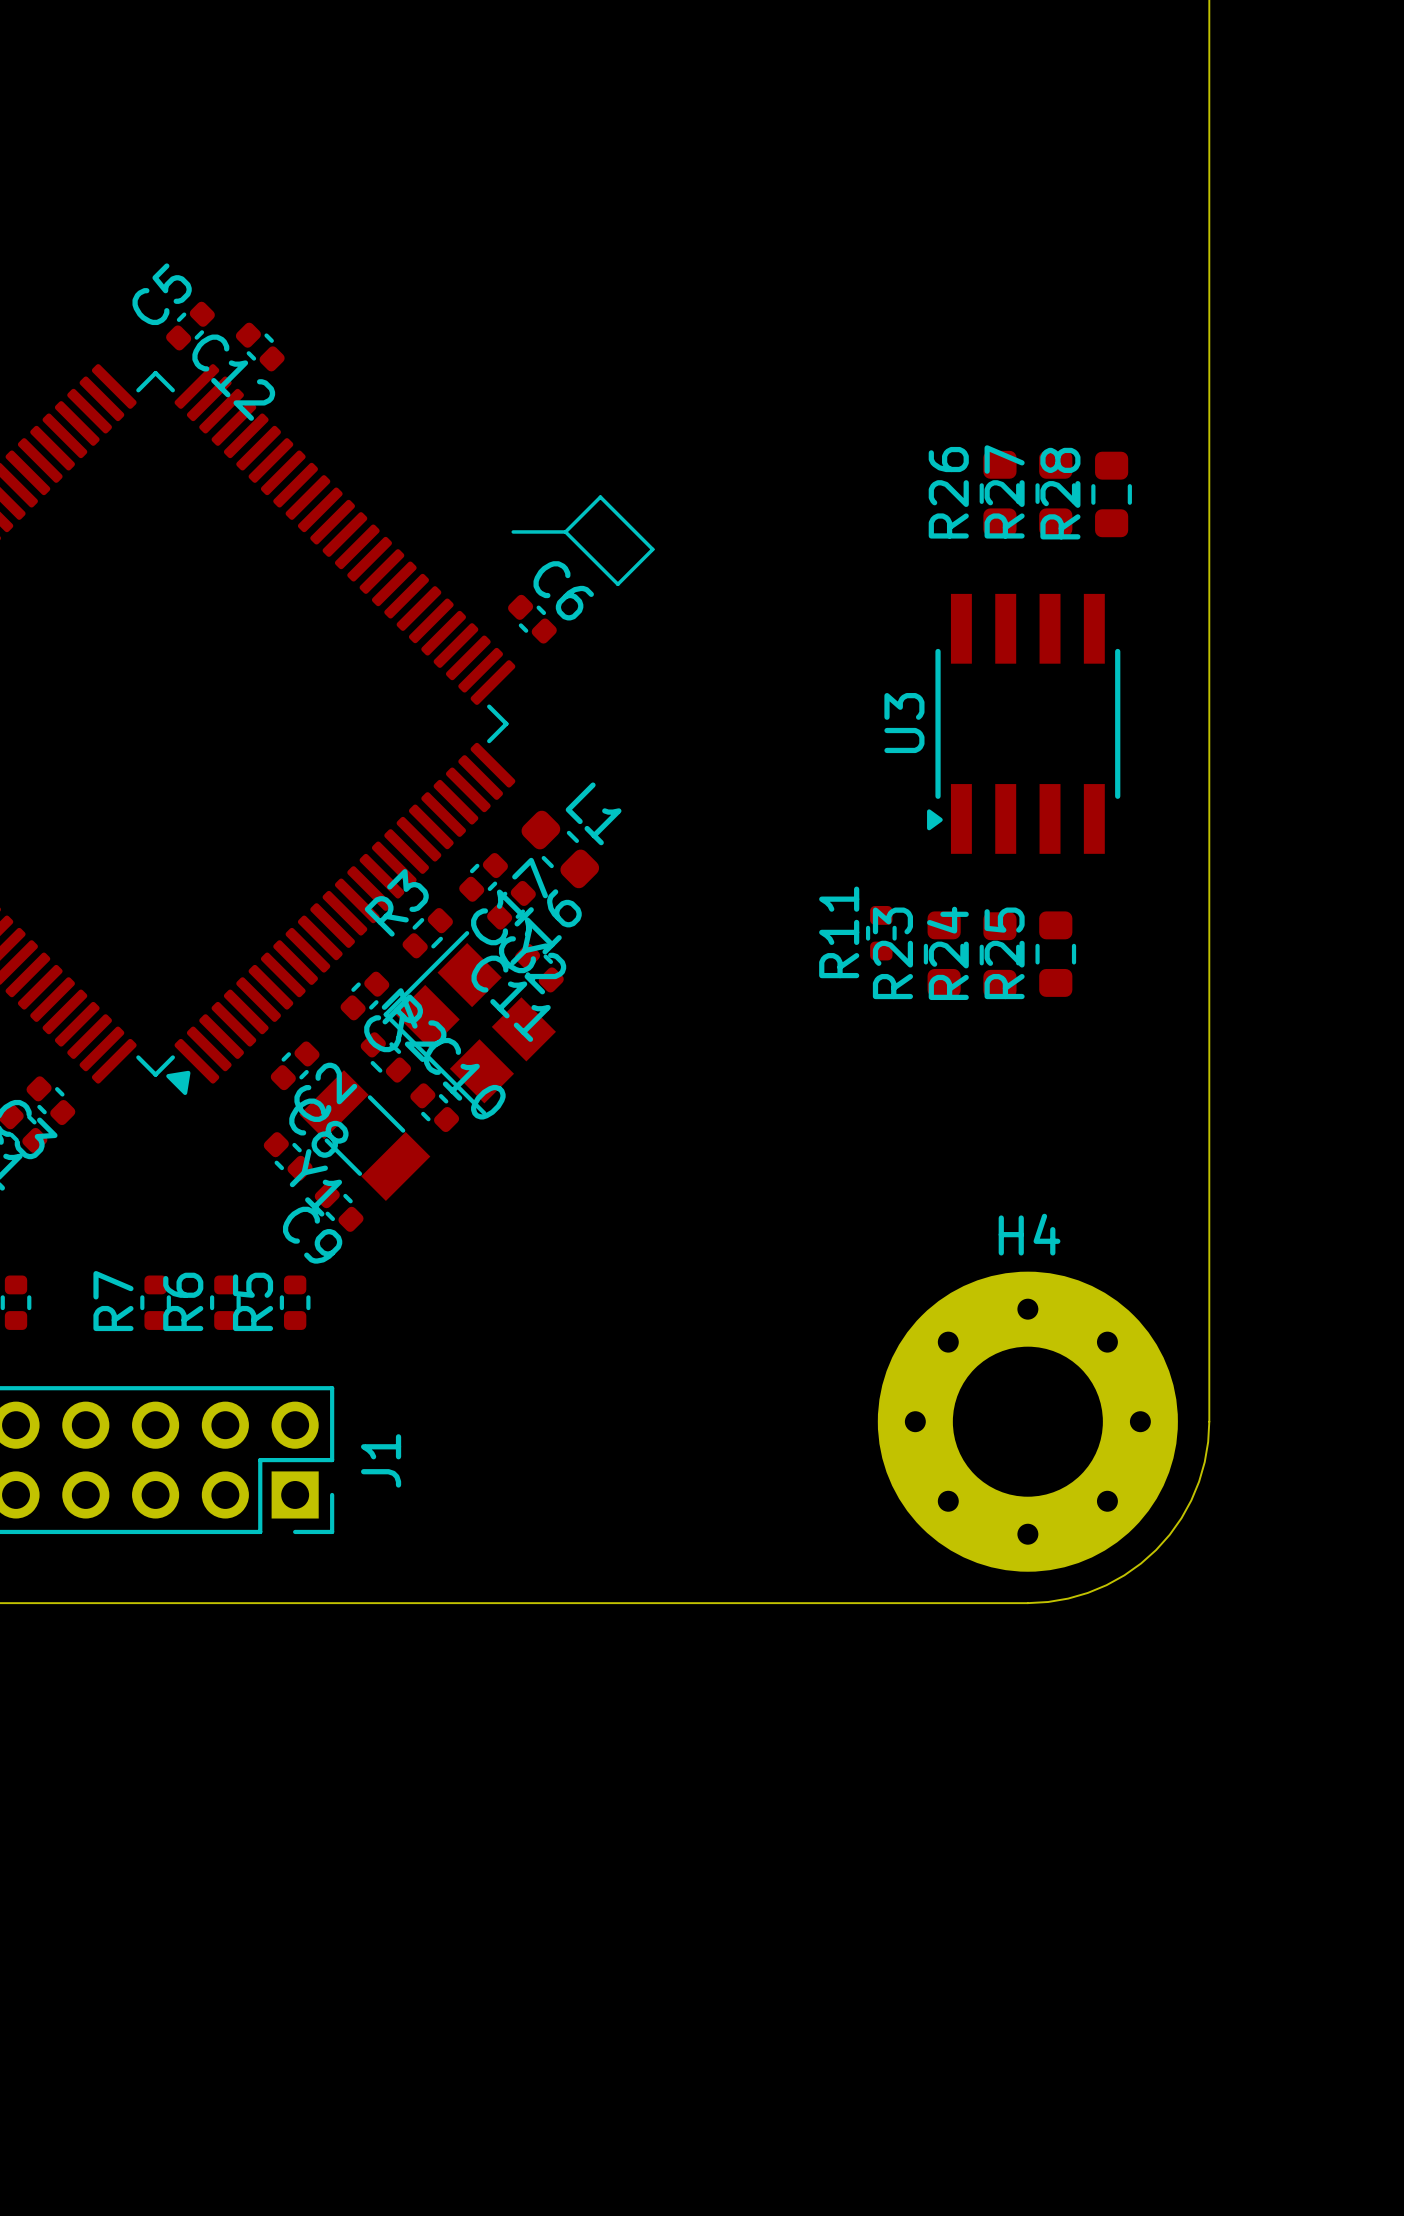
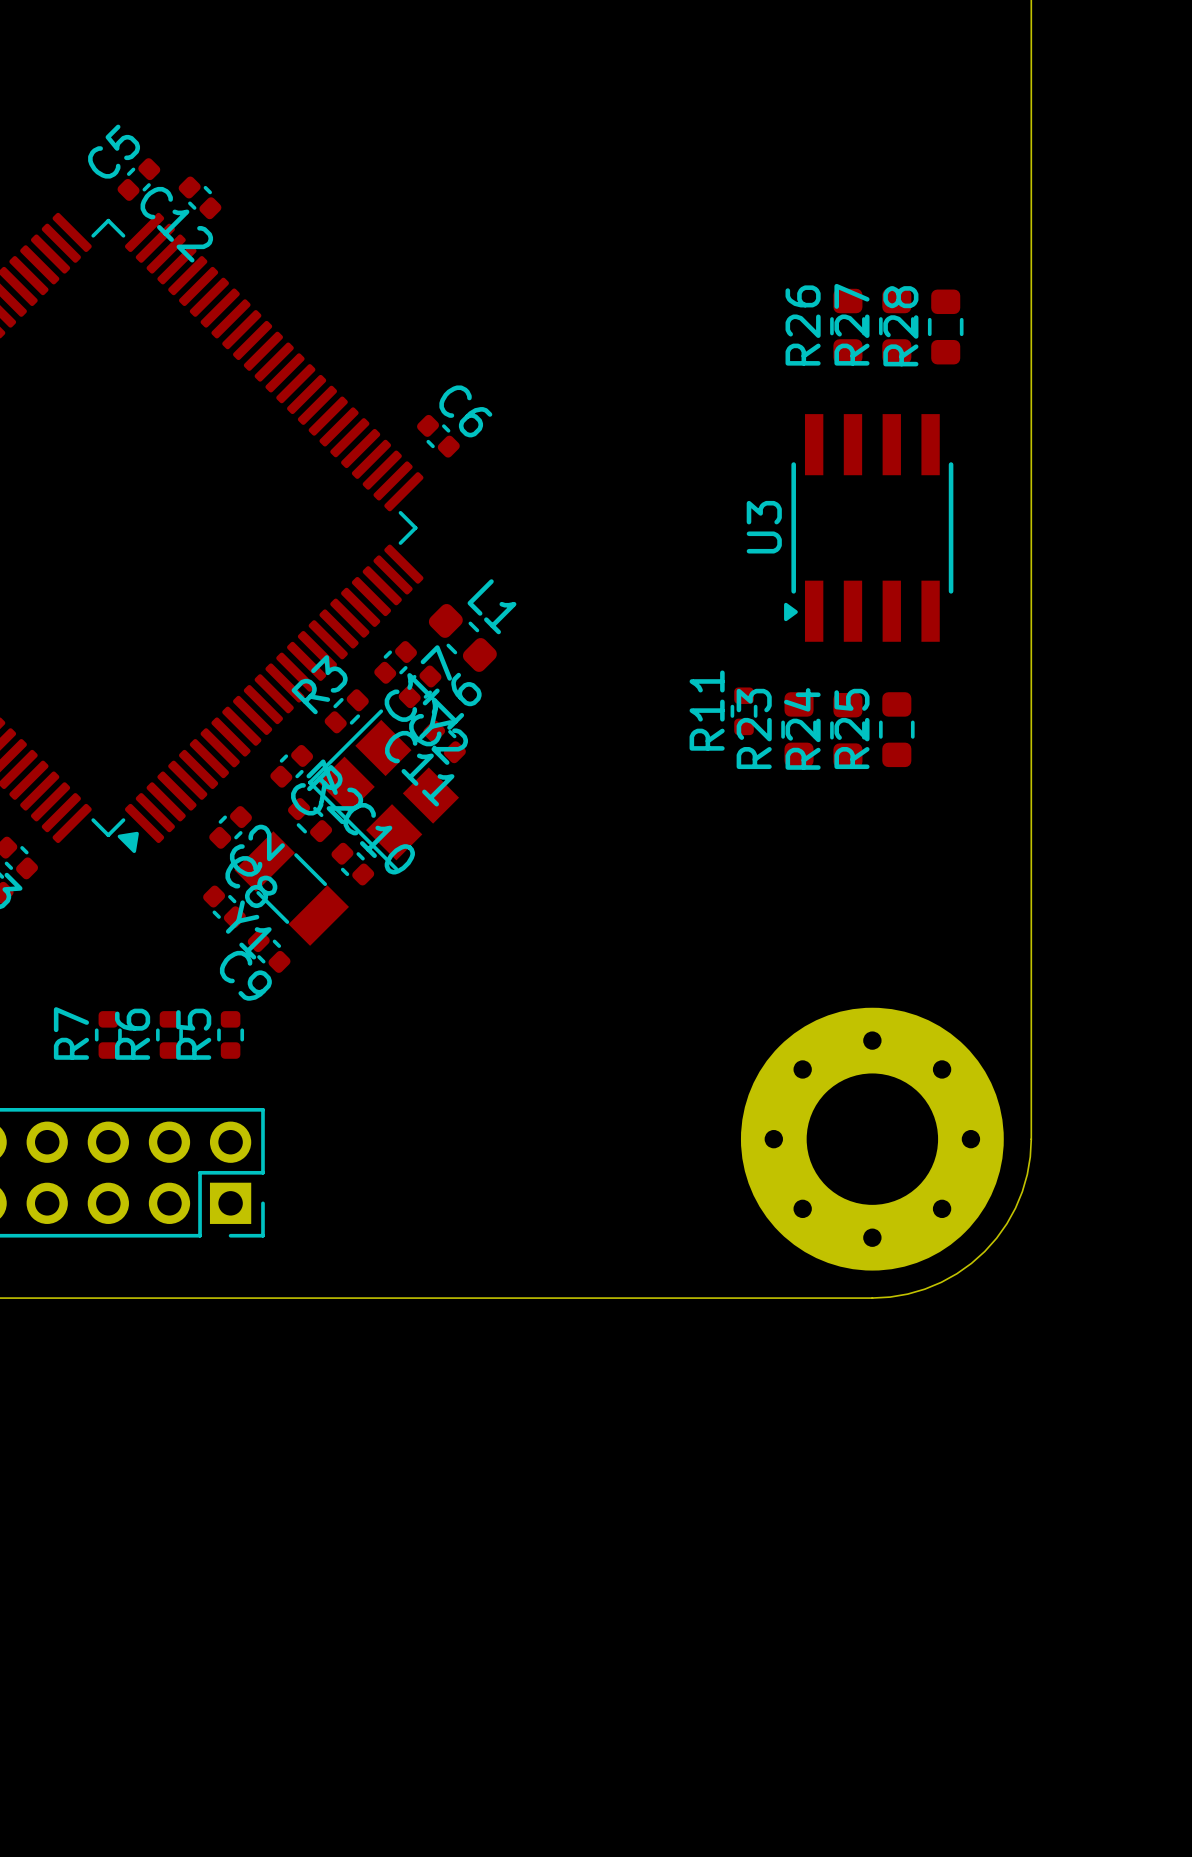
line: (513, 531) (565, 531) -> none
line: (565, 531) (617, 584) (652, 549) (600, 497) (565, 531) -> none
H4 name: H4 (1029, 1234) -> none
J1 name: J1 (381, 1460) -> none

